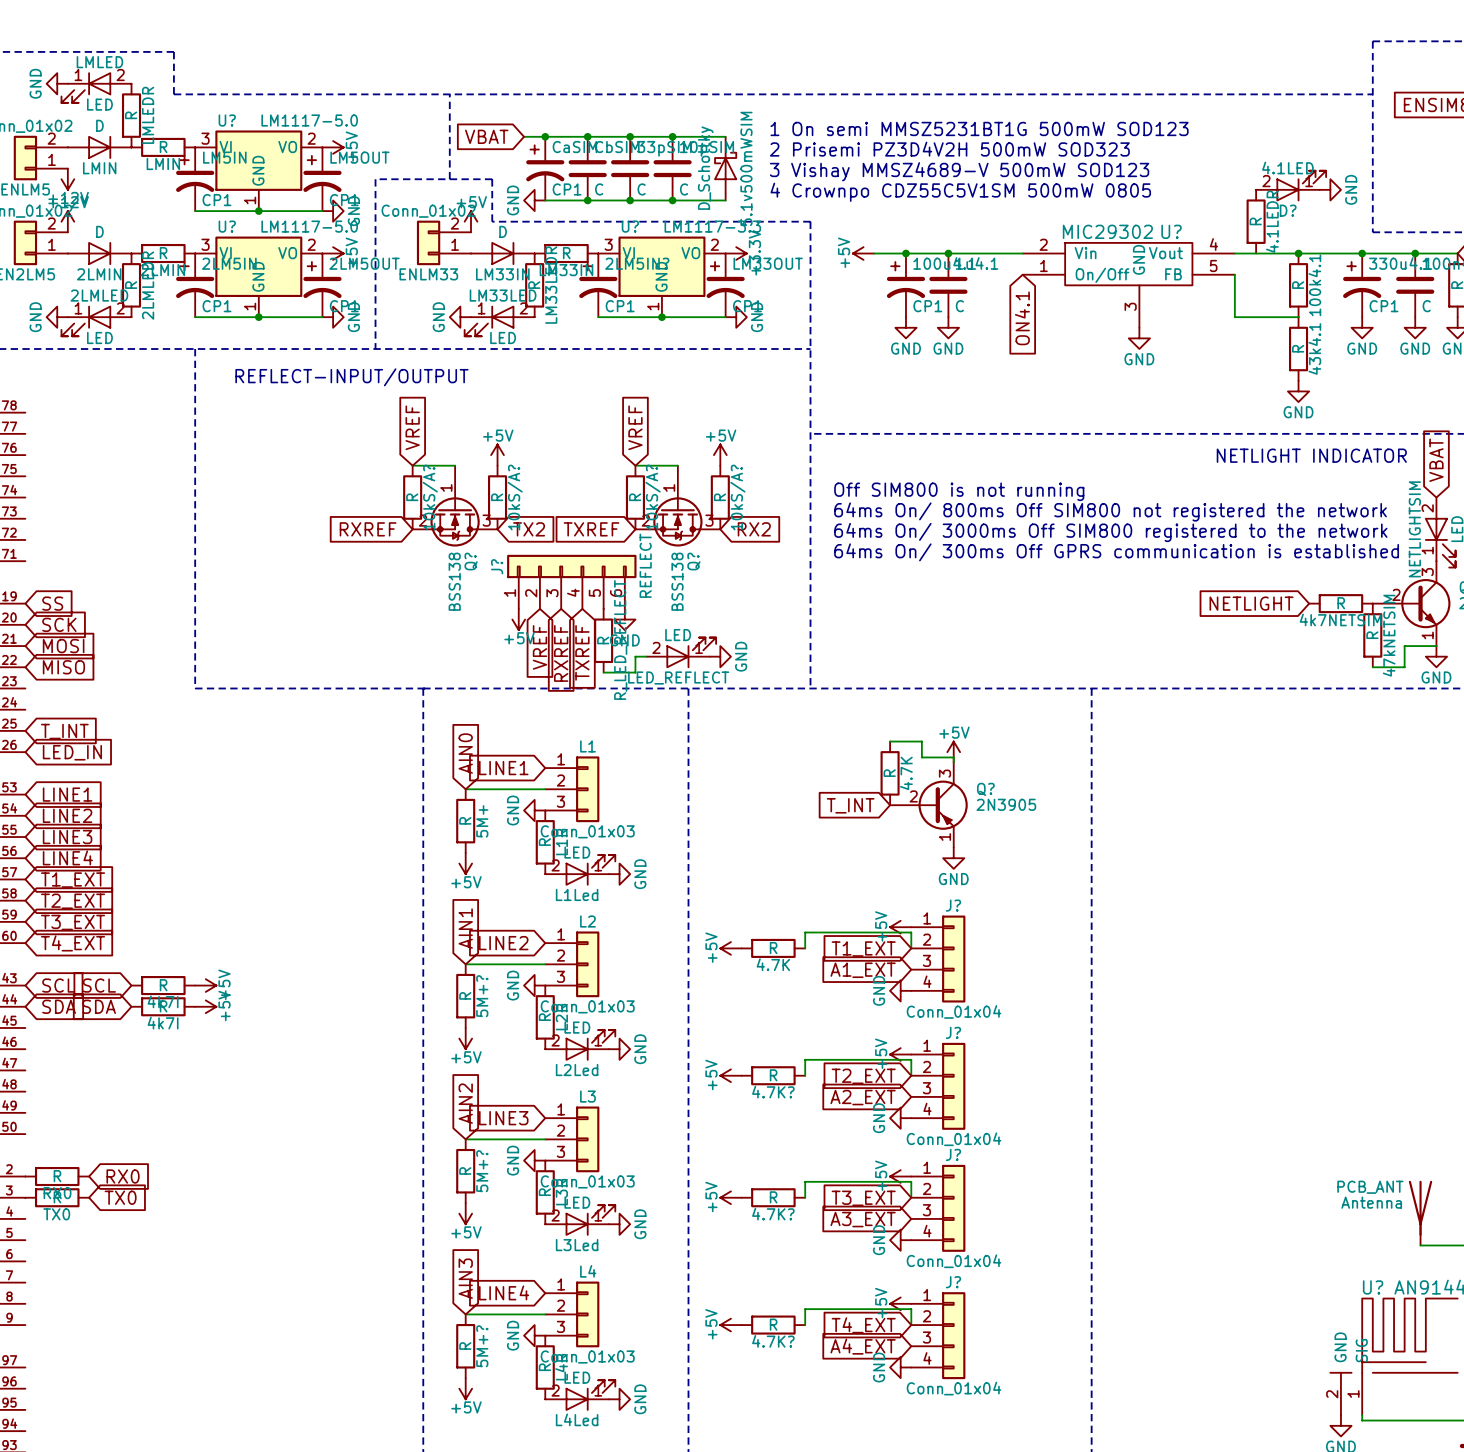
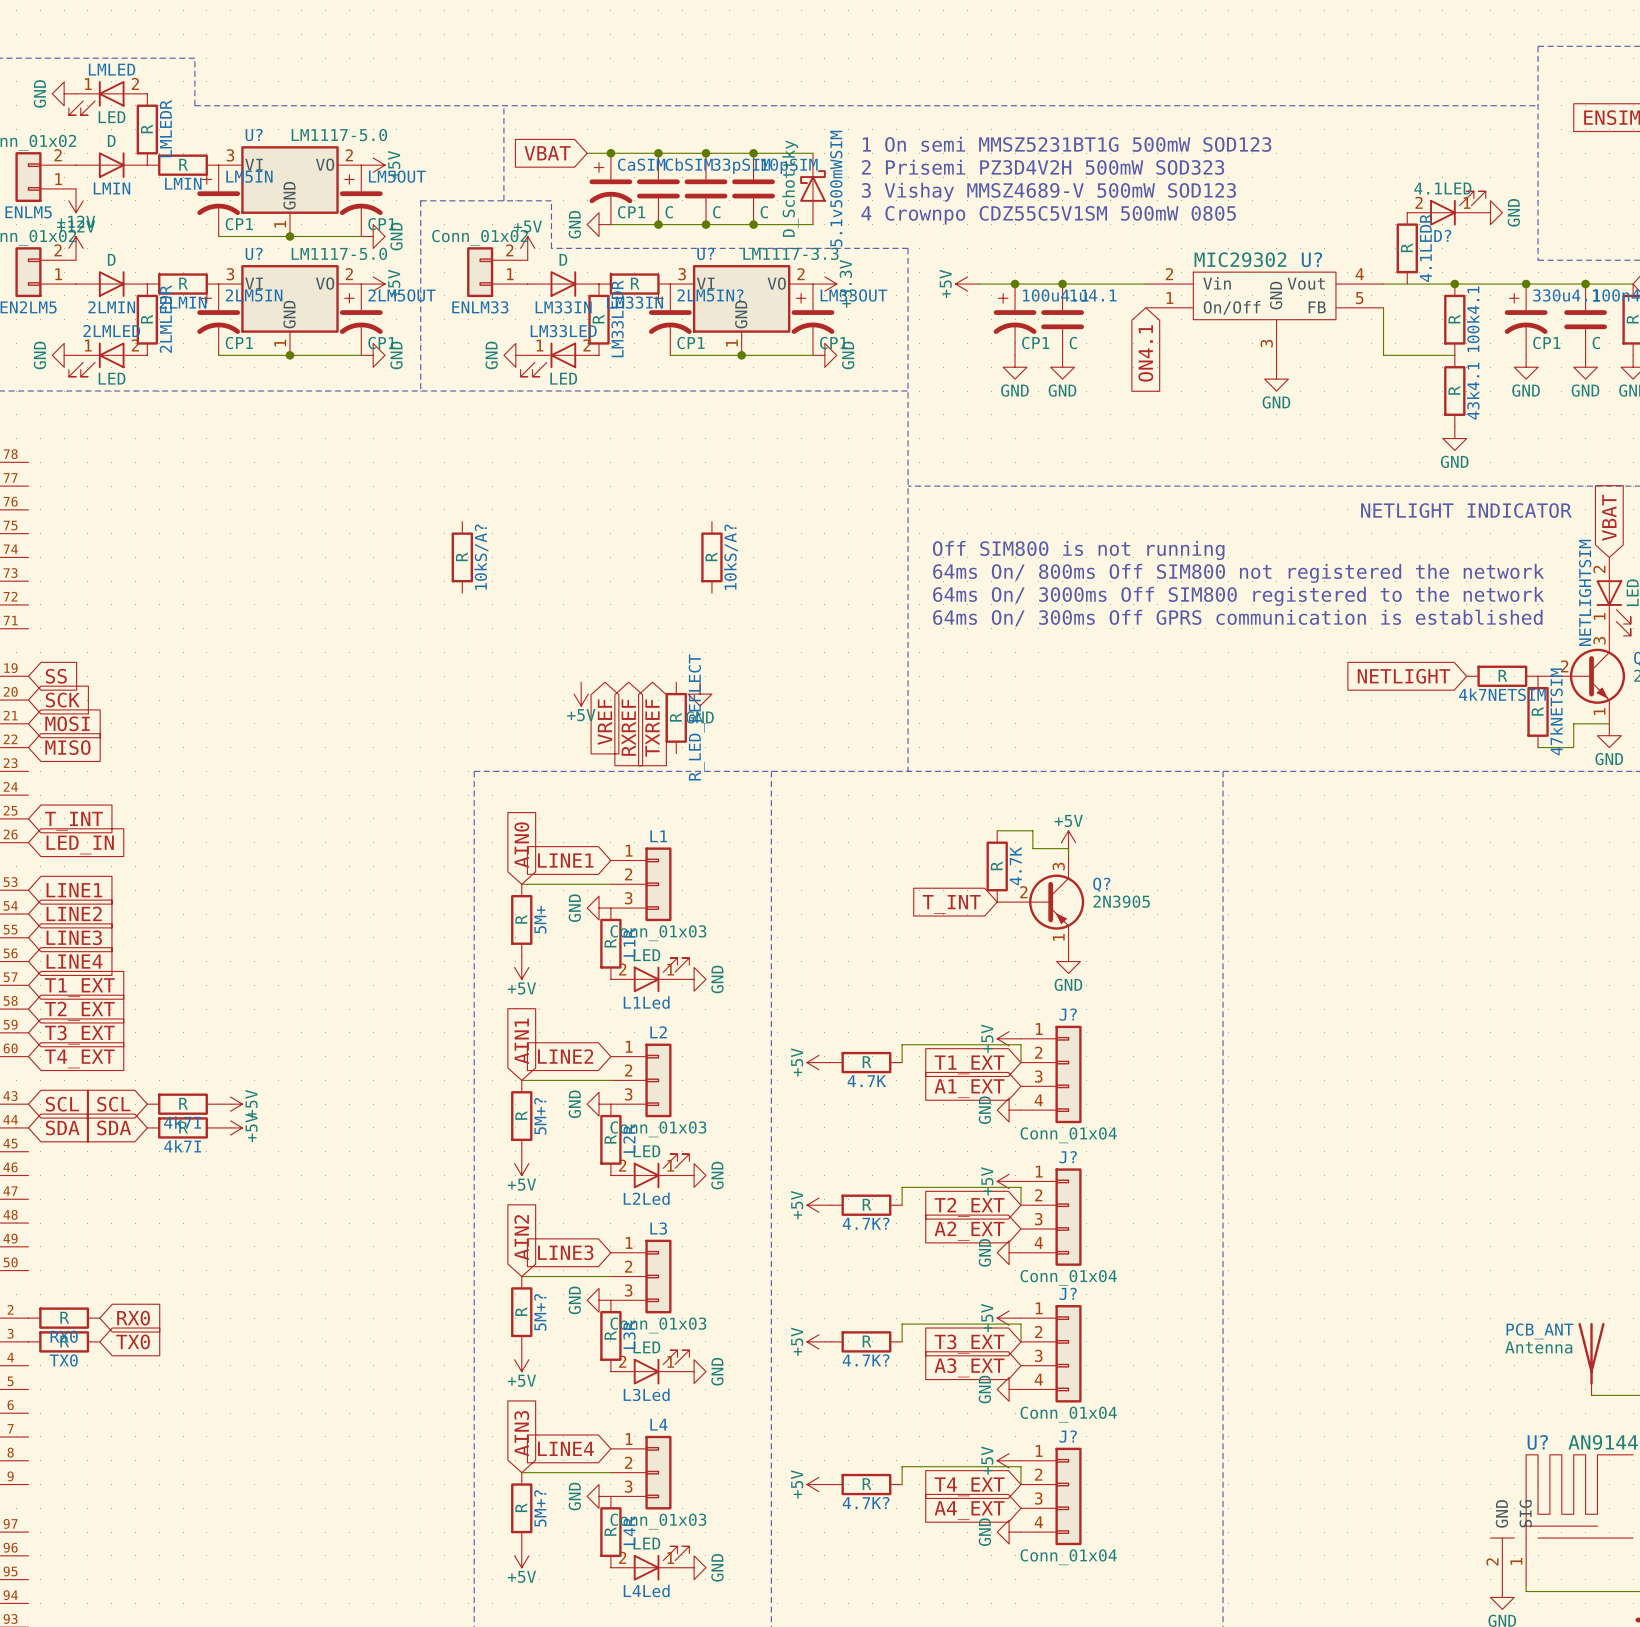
line: (195, 349) (195, 688) (423, 688) -> none
text: REFLECT-INPUT/OUTPUT (351, 377) -> none
global label: VREF (412, 427) -> none
global label: VREF (635, 427) -> none
power symbol: +5V (497, 455) -> none
power symbol: +5V (720, 455) -> none
wire: (412, 465) (455, 465) -> none
wire: (635, 465) (677, 465) -> none
10kS/A?: R (497, 497) -> none
10kS/A?: R (720, 497) -> none
Q?: BSS138 (455, 506) -> none
Q?: BSS138 (677, 506) -> none
global label: RXREF (368, 529) -> none
global label: TX2 (529, 529) -> none
global label: TXREF (591, 529) -> none
global label: RX2 (754, 529) -> none
J?: REFLECT (571, 581) -> none
LED_REFLECT: LED (681, 652) -> none
wire: (646, 656) (635, 656) (635, 672) (603, 672) -> none
power symbol: GND (720, 656) -> none

